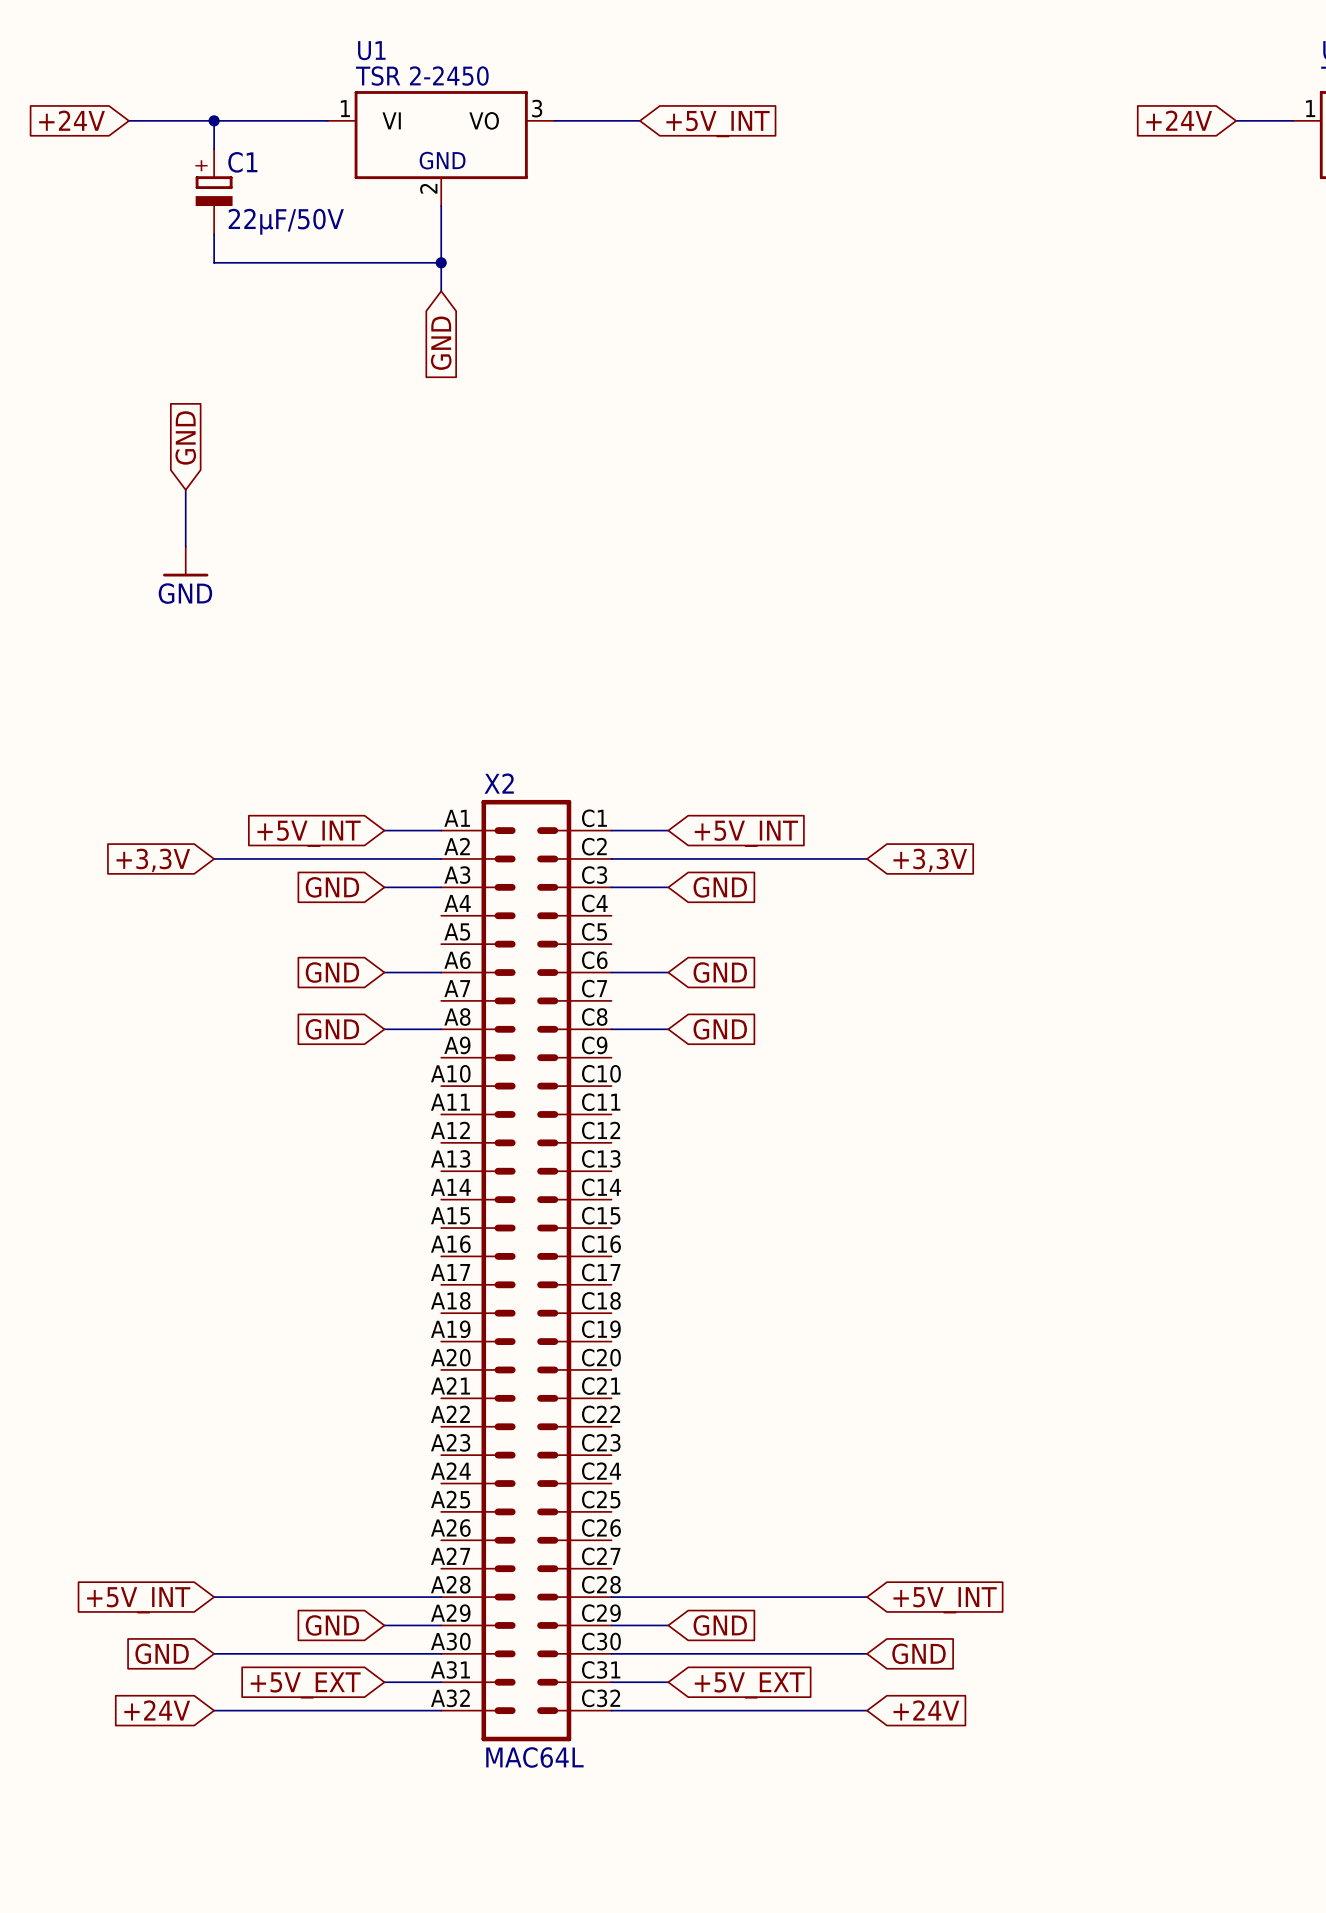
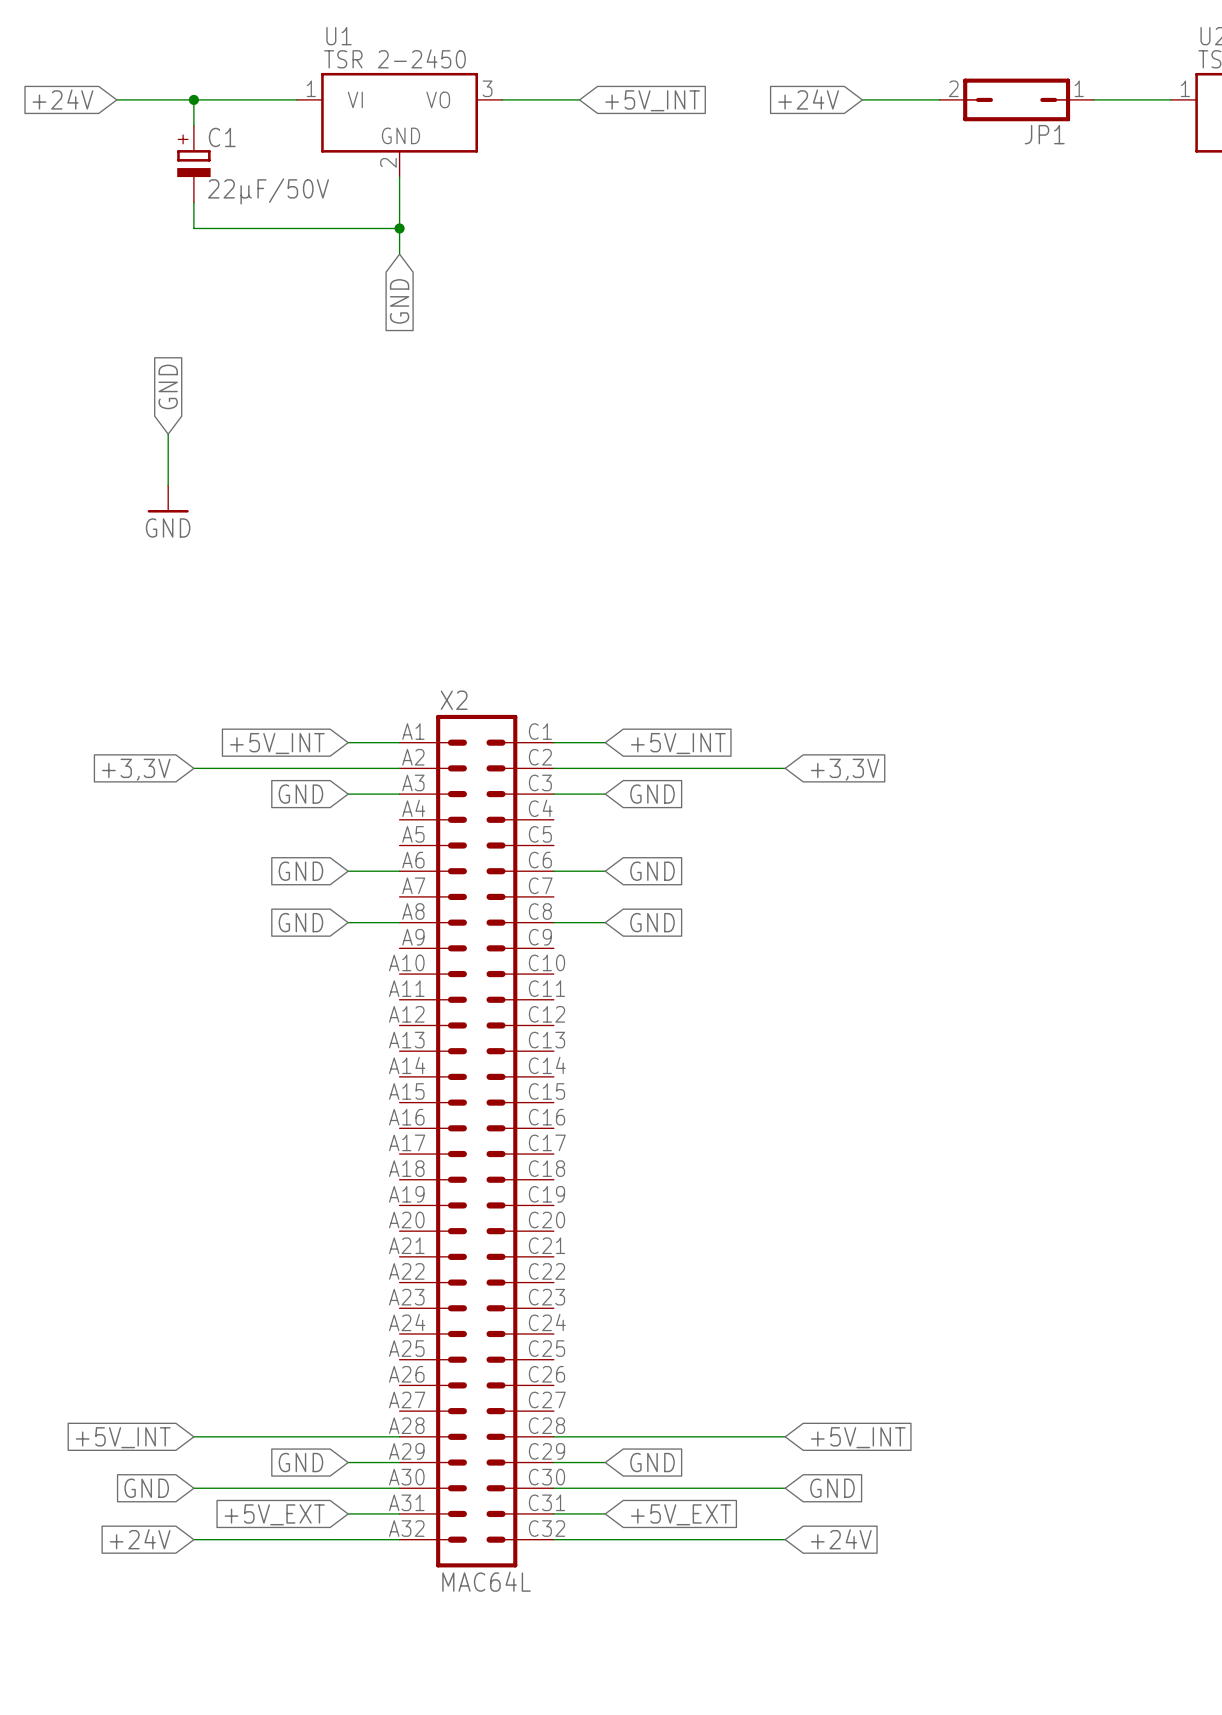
global label: none -> +24V (808, 99)
wire: none -> (862, 99) (939, 99)
JP1: none -> (1016, 99)
global label: +24V (1179, 120) -> none
wire: none -> (1093, 99) (1119, 99)

